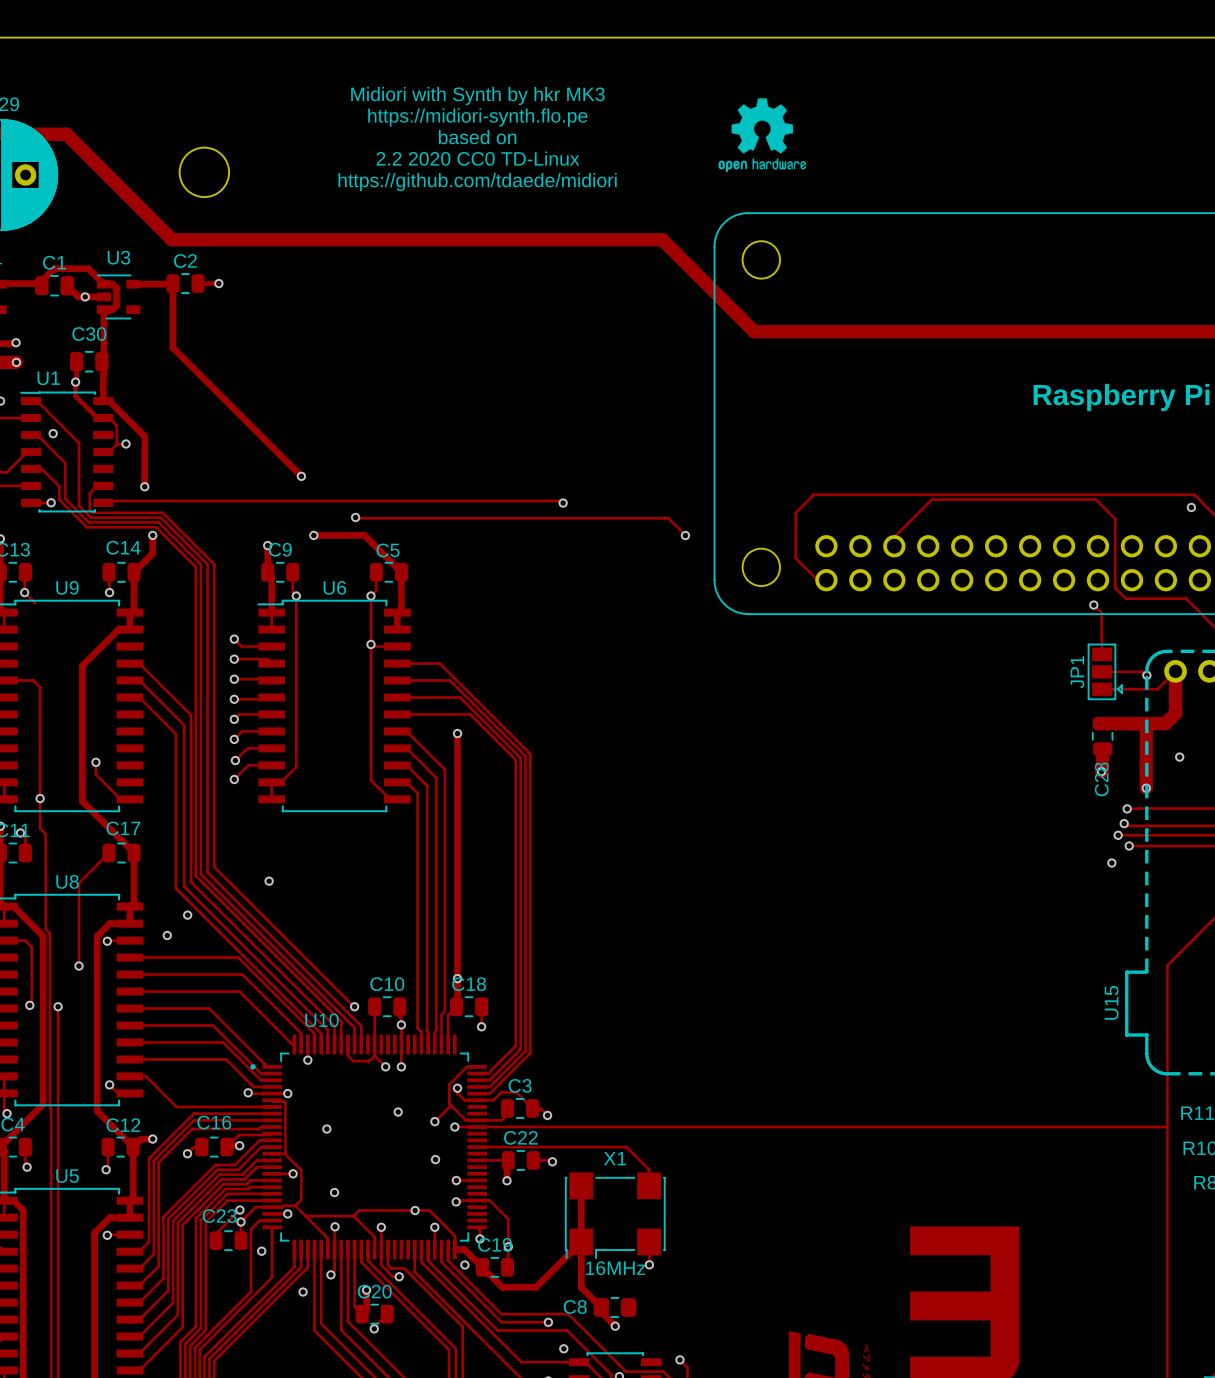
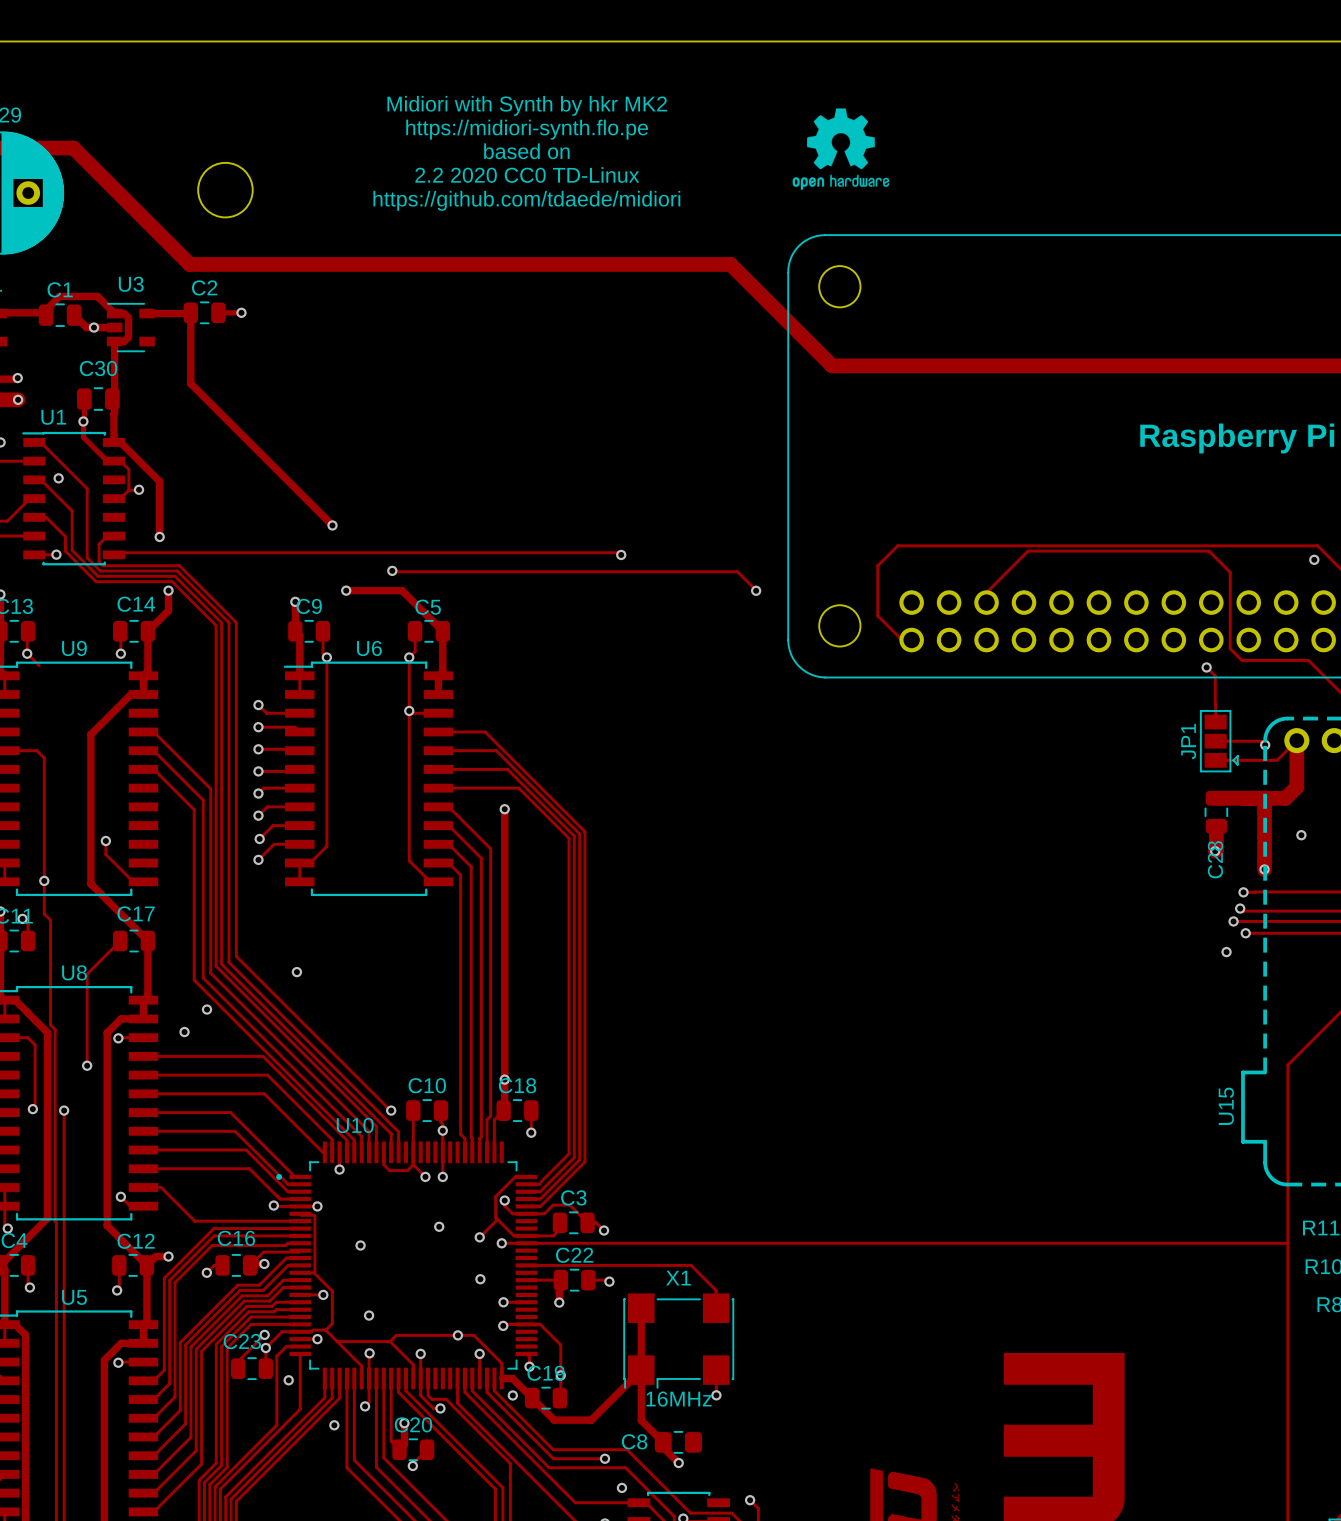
text: Midiori with Synth by hkr MK3 (477, 95) -> Midiori with Synth by hkr MK2 (527, 105)

